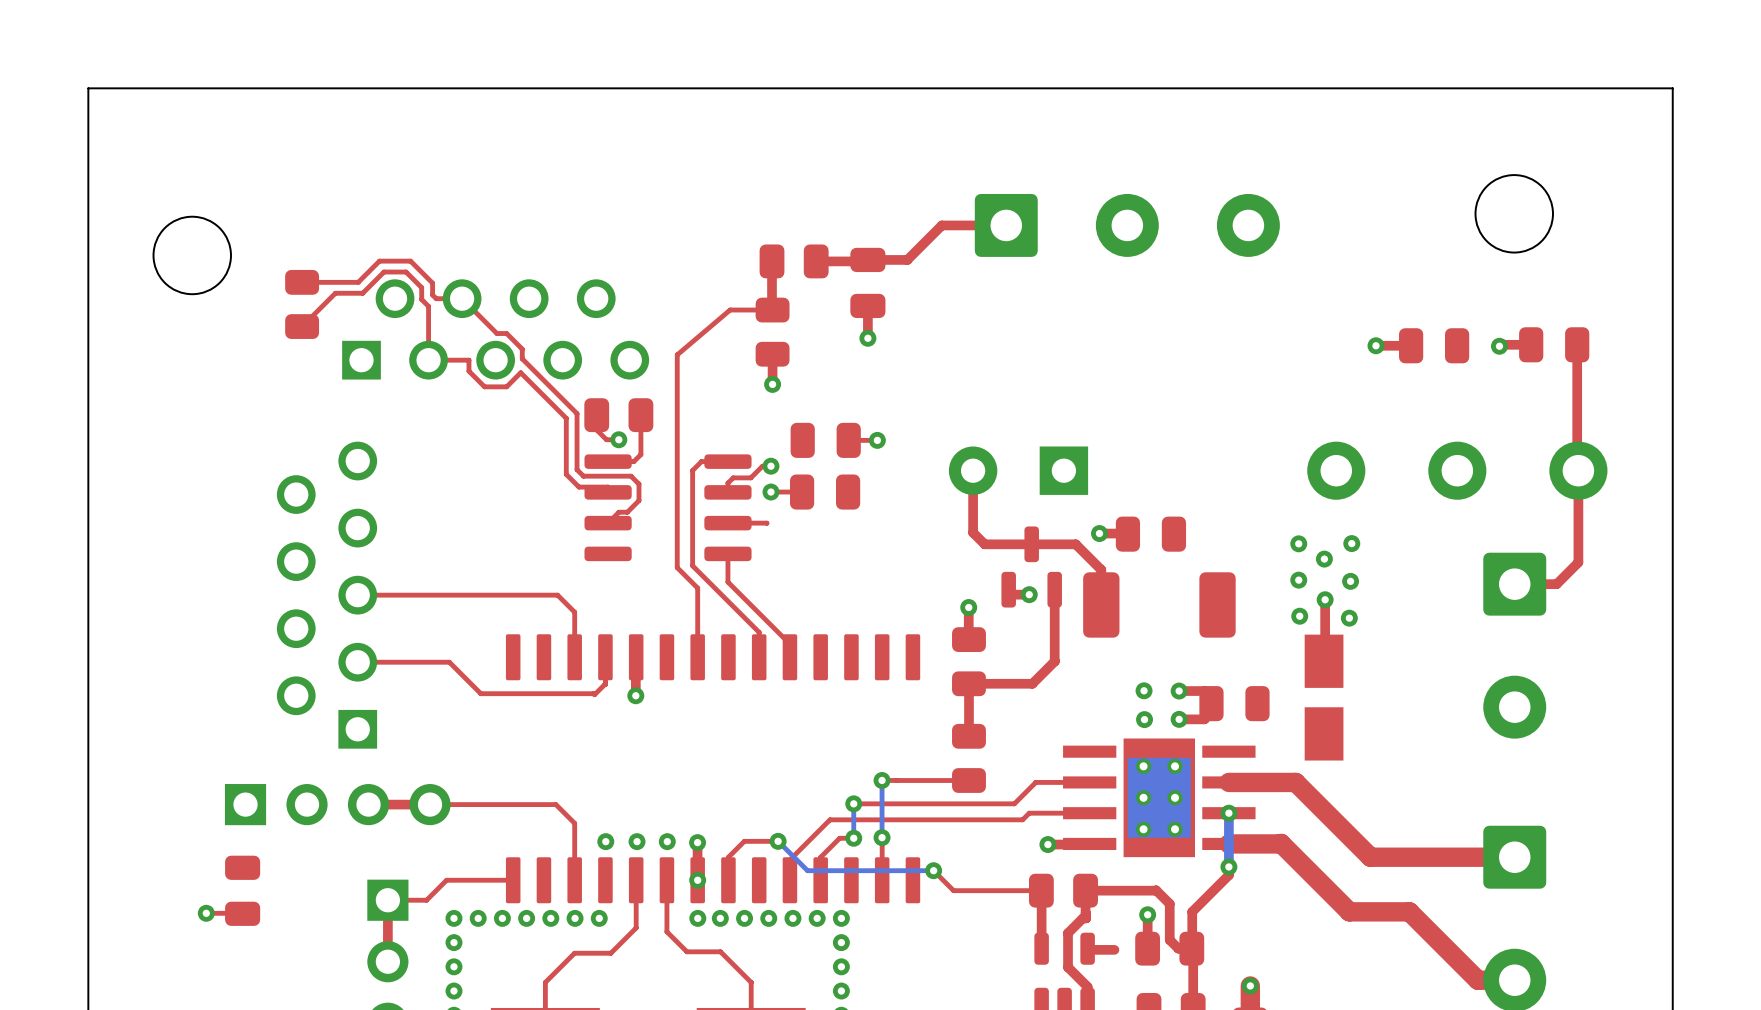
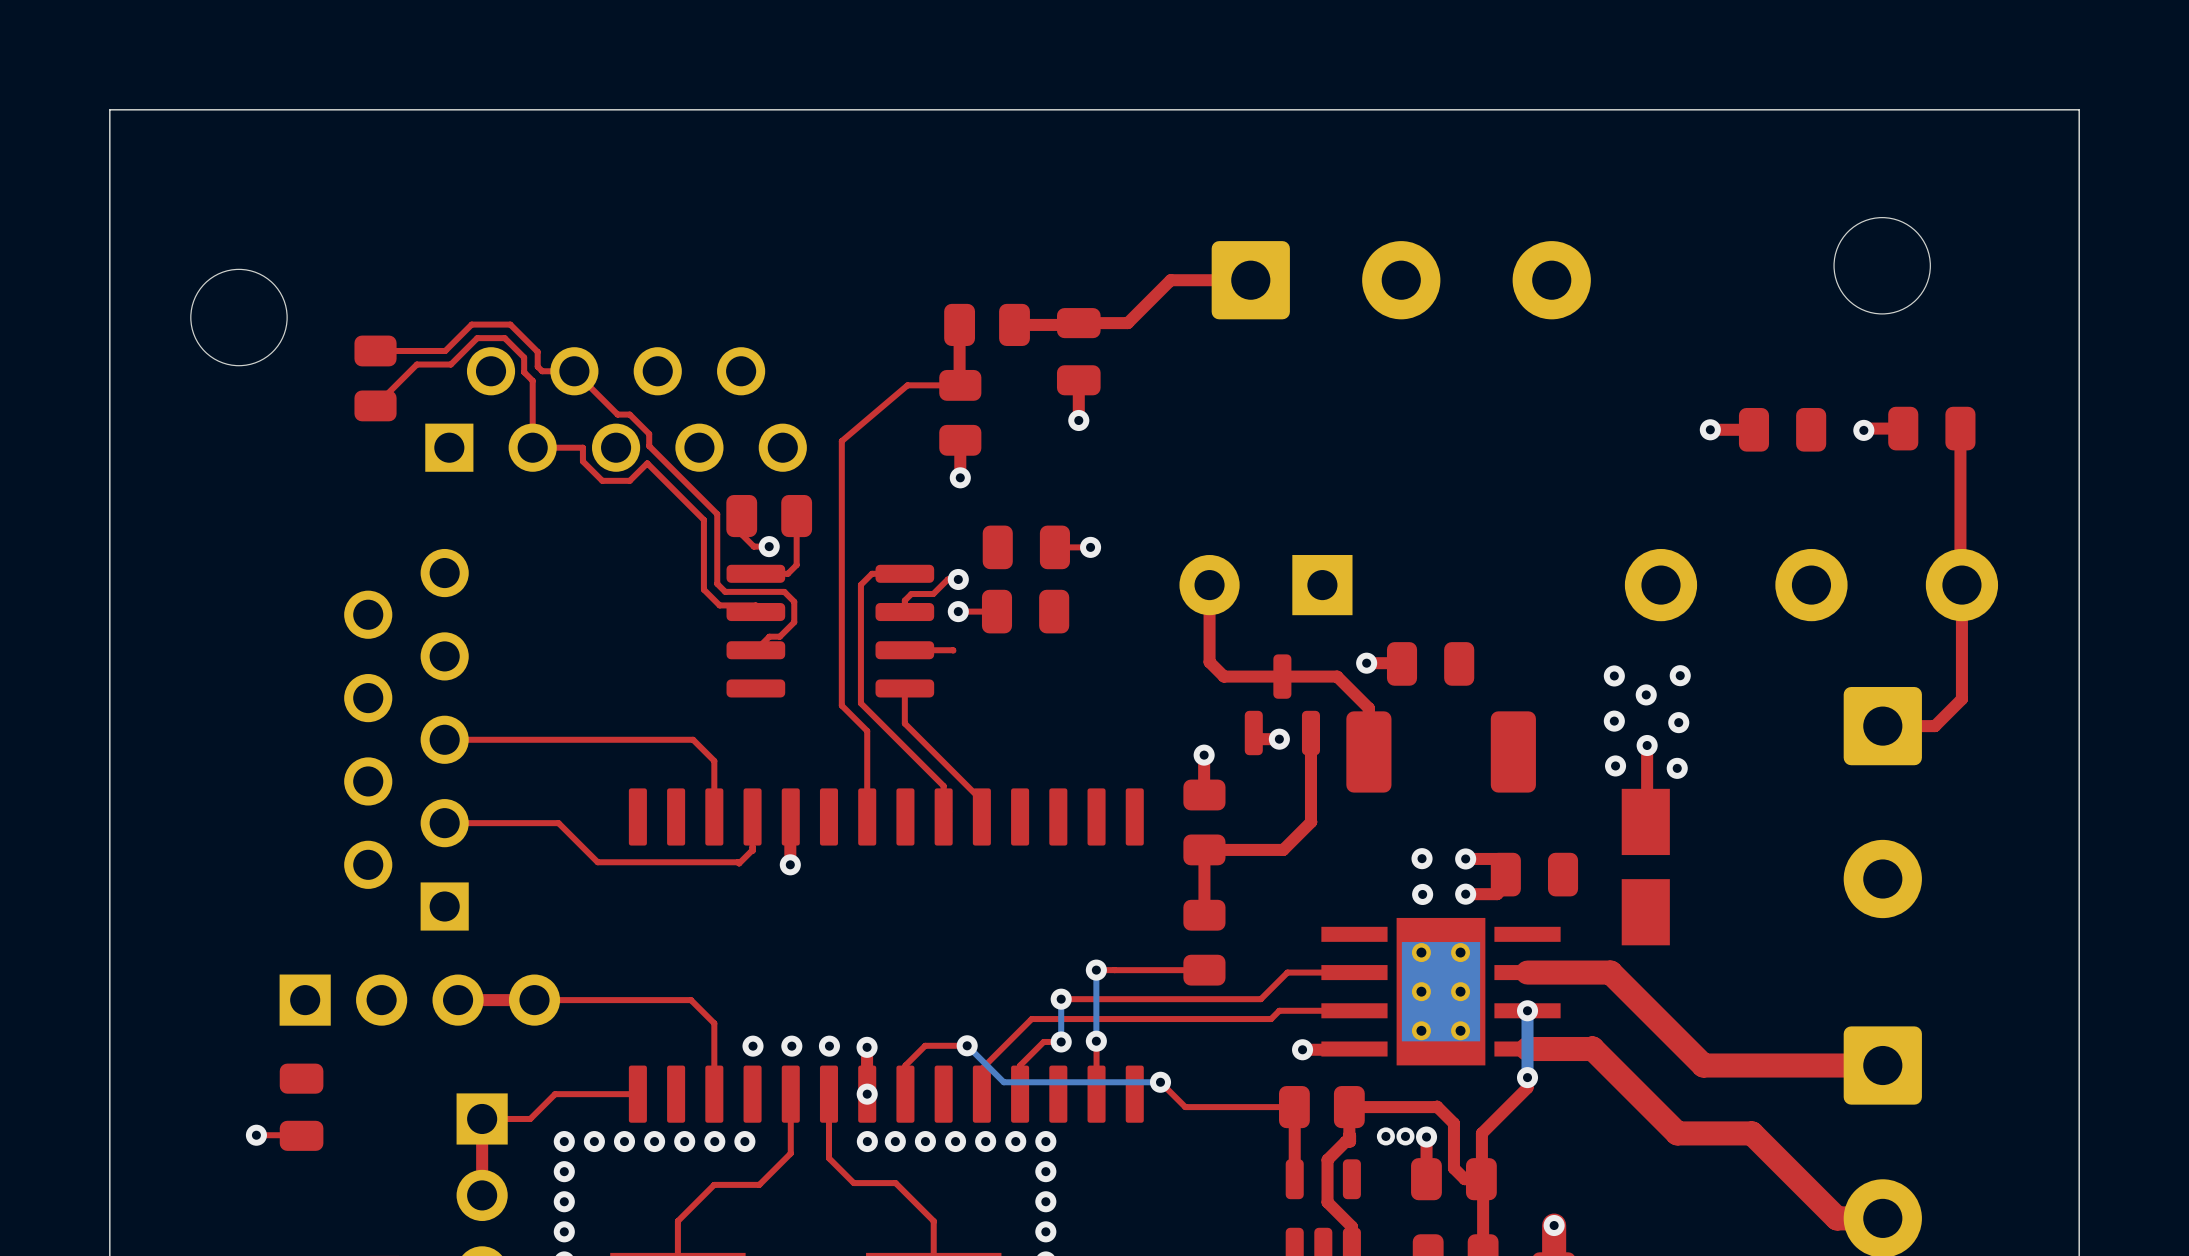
via: none -> (1385, 1136)
via: none -> (1405, 1136)
top track: (1114, 949) (1088, 949) -> none

